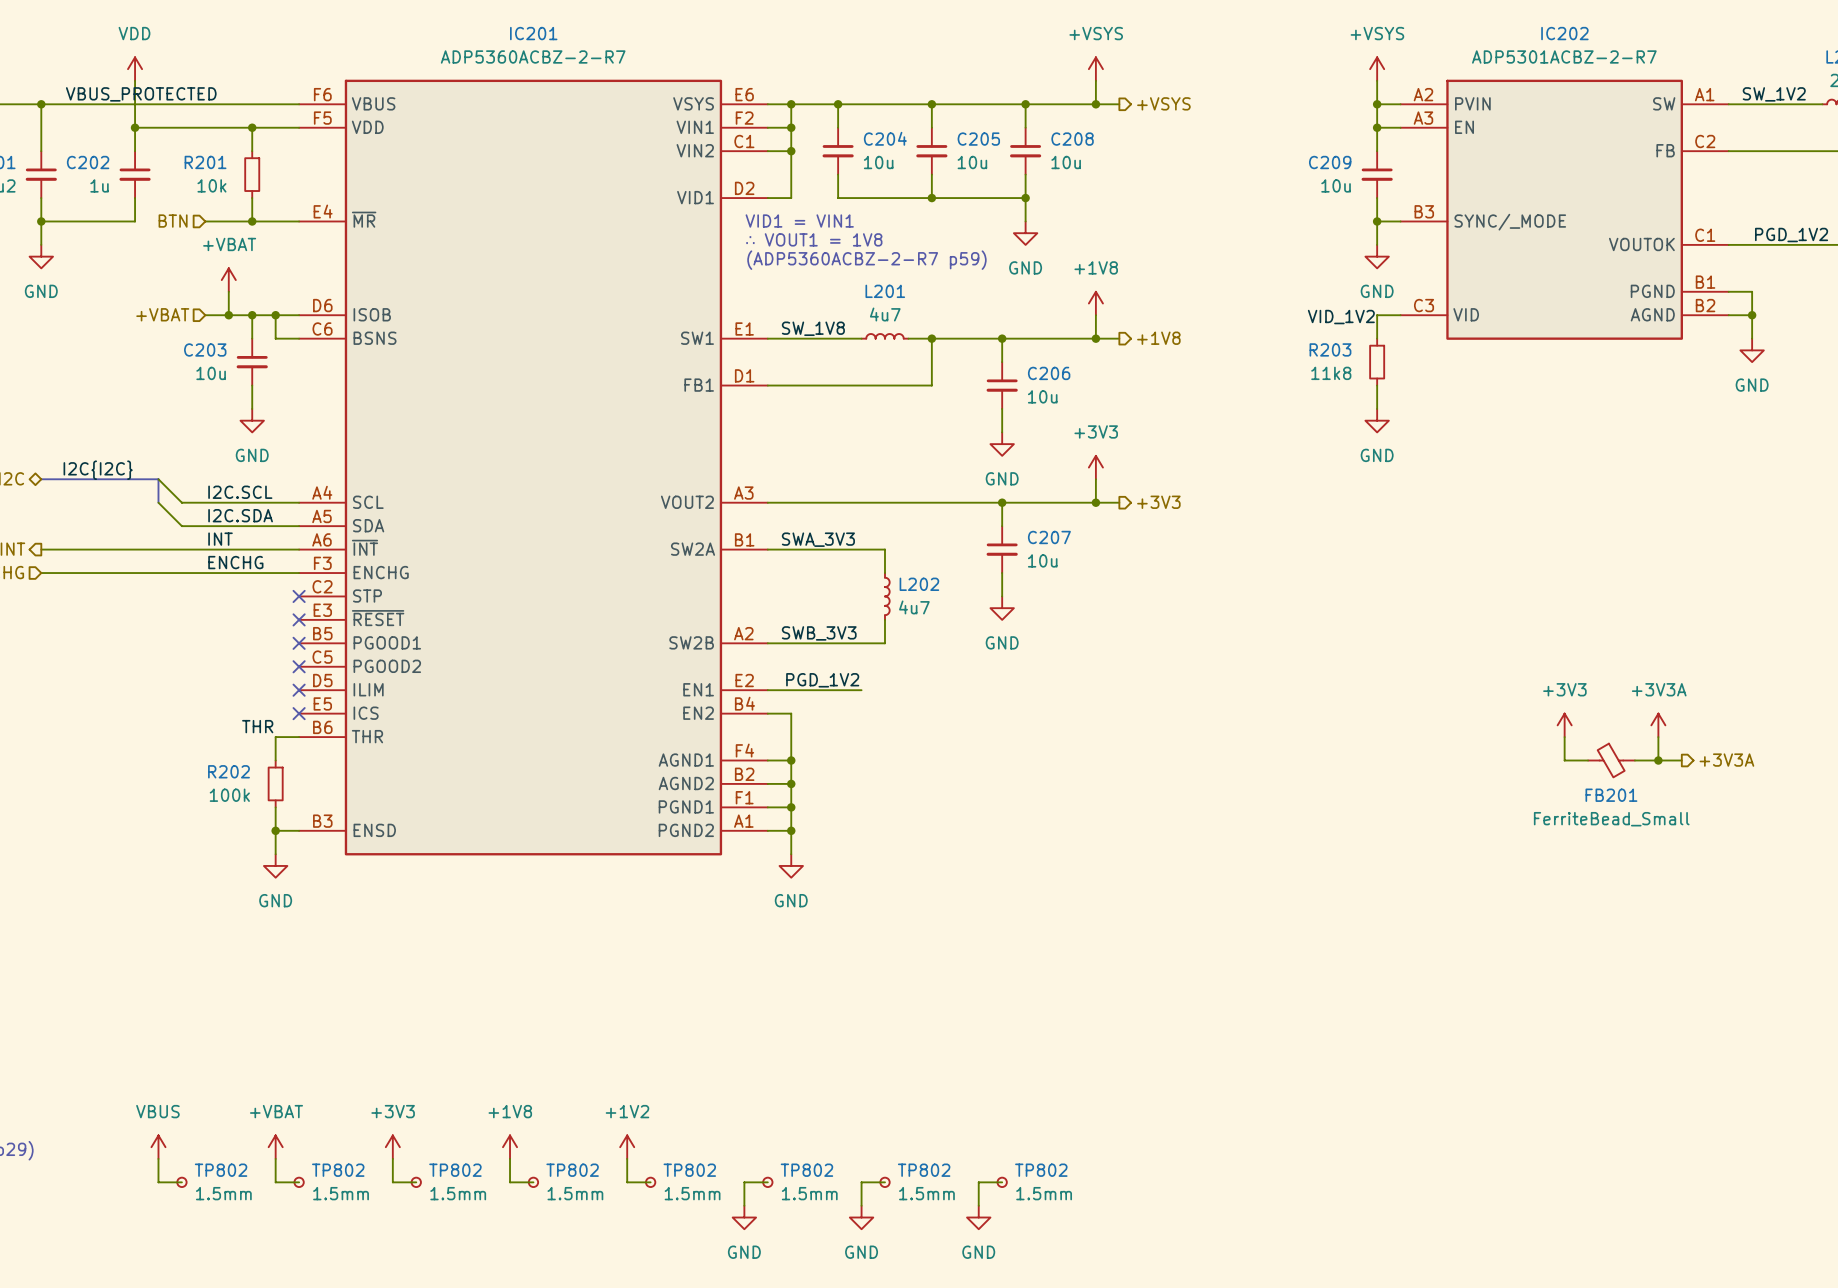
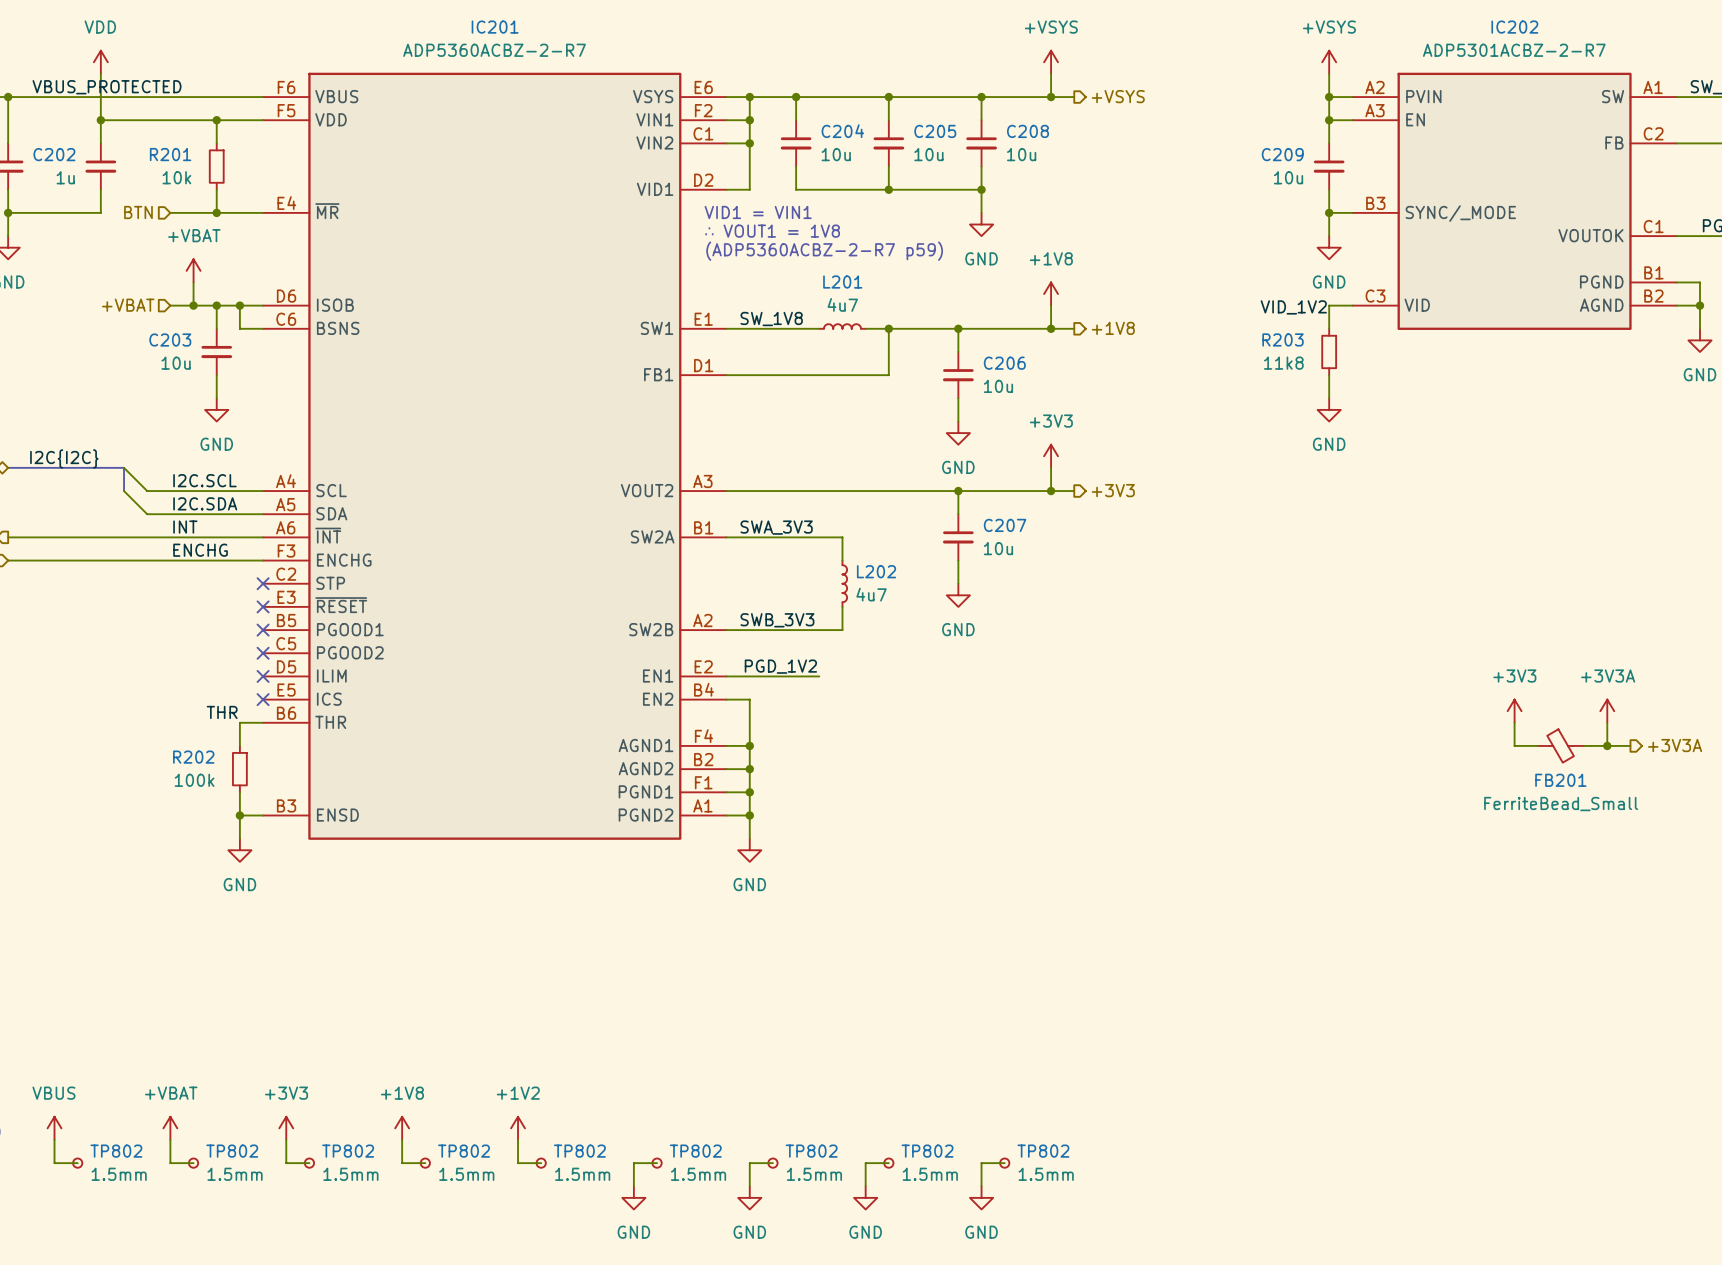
power symbol position: VBUS (158, 1147) -> VBUS (54, 1128)
power symbol position: +VBAT (275, 1147) -> +VBAT (170, 1128)
power symbol position: +3V3 (392, 1147) -> +3V3 (286, 1128)
power symbol position: +1V8 (510, 1147) -> +1V8 (402, 1128)
power symbol position: +1V2 (627, 1147) -> +1V2 (518, 1128)
wire: (158, 1158) (158, 1182) (181, 1182) -> (54, 1139) (54, 1163) (77, 1163)
wire: (275, 1158) (275, 1182) (299, 1182) -> (170, 1139) (170, 1163) (193, 1163)
wire: (392, 1158) (392, 1182) (416, 1182) -> (286, 1139) (286, 1163) (309, 1163)
wire: (510, 1158) (510, 1182) (533, 1182) -> (402, 1139) (402, 1163) (425, 1163)
wire: (627, 1158) (627, 1182) (650, 1182) -> (518, 1139) (518, 1163) (541, 1163)
TP802: none -> 1.5mm (77, 1163)
TP802: 1.5mm (181, 1182) -> none
TP802: none -> 1.5mm (193, 1163)
TP802: 1.5mm (299, 1182) -> none
TP802: none -> 1.5mm (309, 1163)
TP802: 1.5mm (416, 1182) -> none
TP802: none -> 1.5mm (425, 1163)
TP802: 1.5mm (533, 1182) -> none
TP802: none -> 1.5mm (541, 1163)
TP802: 1.5mm (650, 1182) -> none
TP802: none -> 1.5mm (657, 1163)
wire: (767, 1182) (744, 1182) (744, 1205) -> (657, 1163) (633, 1163) (633, 1186)
TP802: 1.5mm (767, 1182) -> none
TP802: none -> 1.5mm (772, 1163)
wire: (884, 1182) (861, 1182) (861, 1205) -> (772, 1163) (749, 1163) (749, 1186)
TP802: 1.5mm (884, 1182) -> none
TP802: none -> 1.5mm (888, 1163)
wire: (1002, 1182) (978, 1182) (978, 1205) -> (888, 1163) (865, 1163) (865, 1186)
TP802: 1.5mm (1002, 1182) -> none
wire: none -> (1004, 1163) (981, 1163) (981, 1186)
TP802: none -> 1.5mm (1004, 1163)
power symbol: none -> GND (633, 1197)
power symbol: GND (744, 1217) -> none
power symbol: none -> GND (749, 1197)
power symbol: GND (861, 1217) -> none
power symbol: none -> GND (865, 1197)
power symbol: GND (978, 1217) -> none
power symbol: none -> GND (981, 1197)

